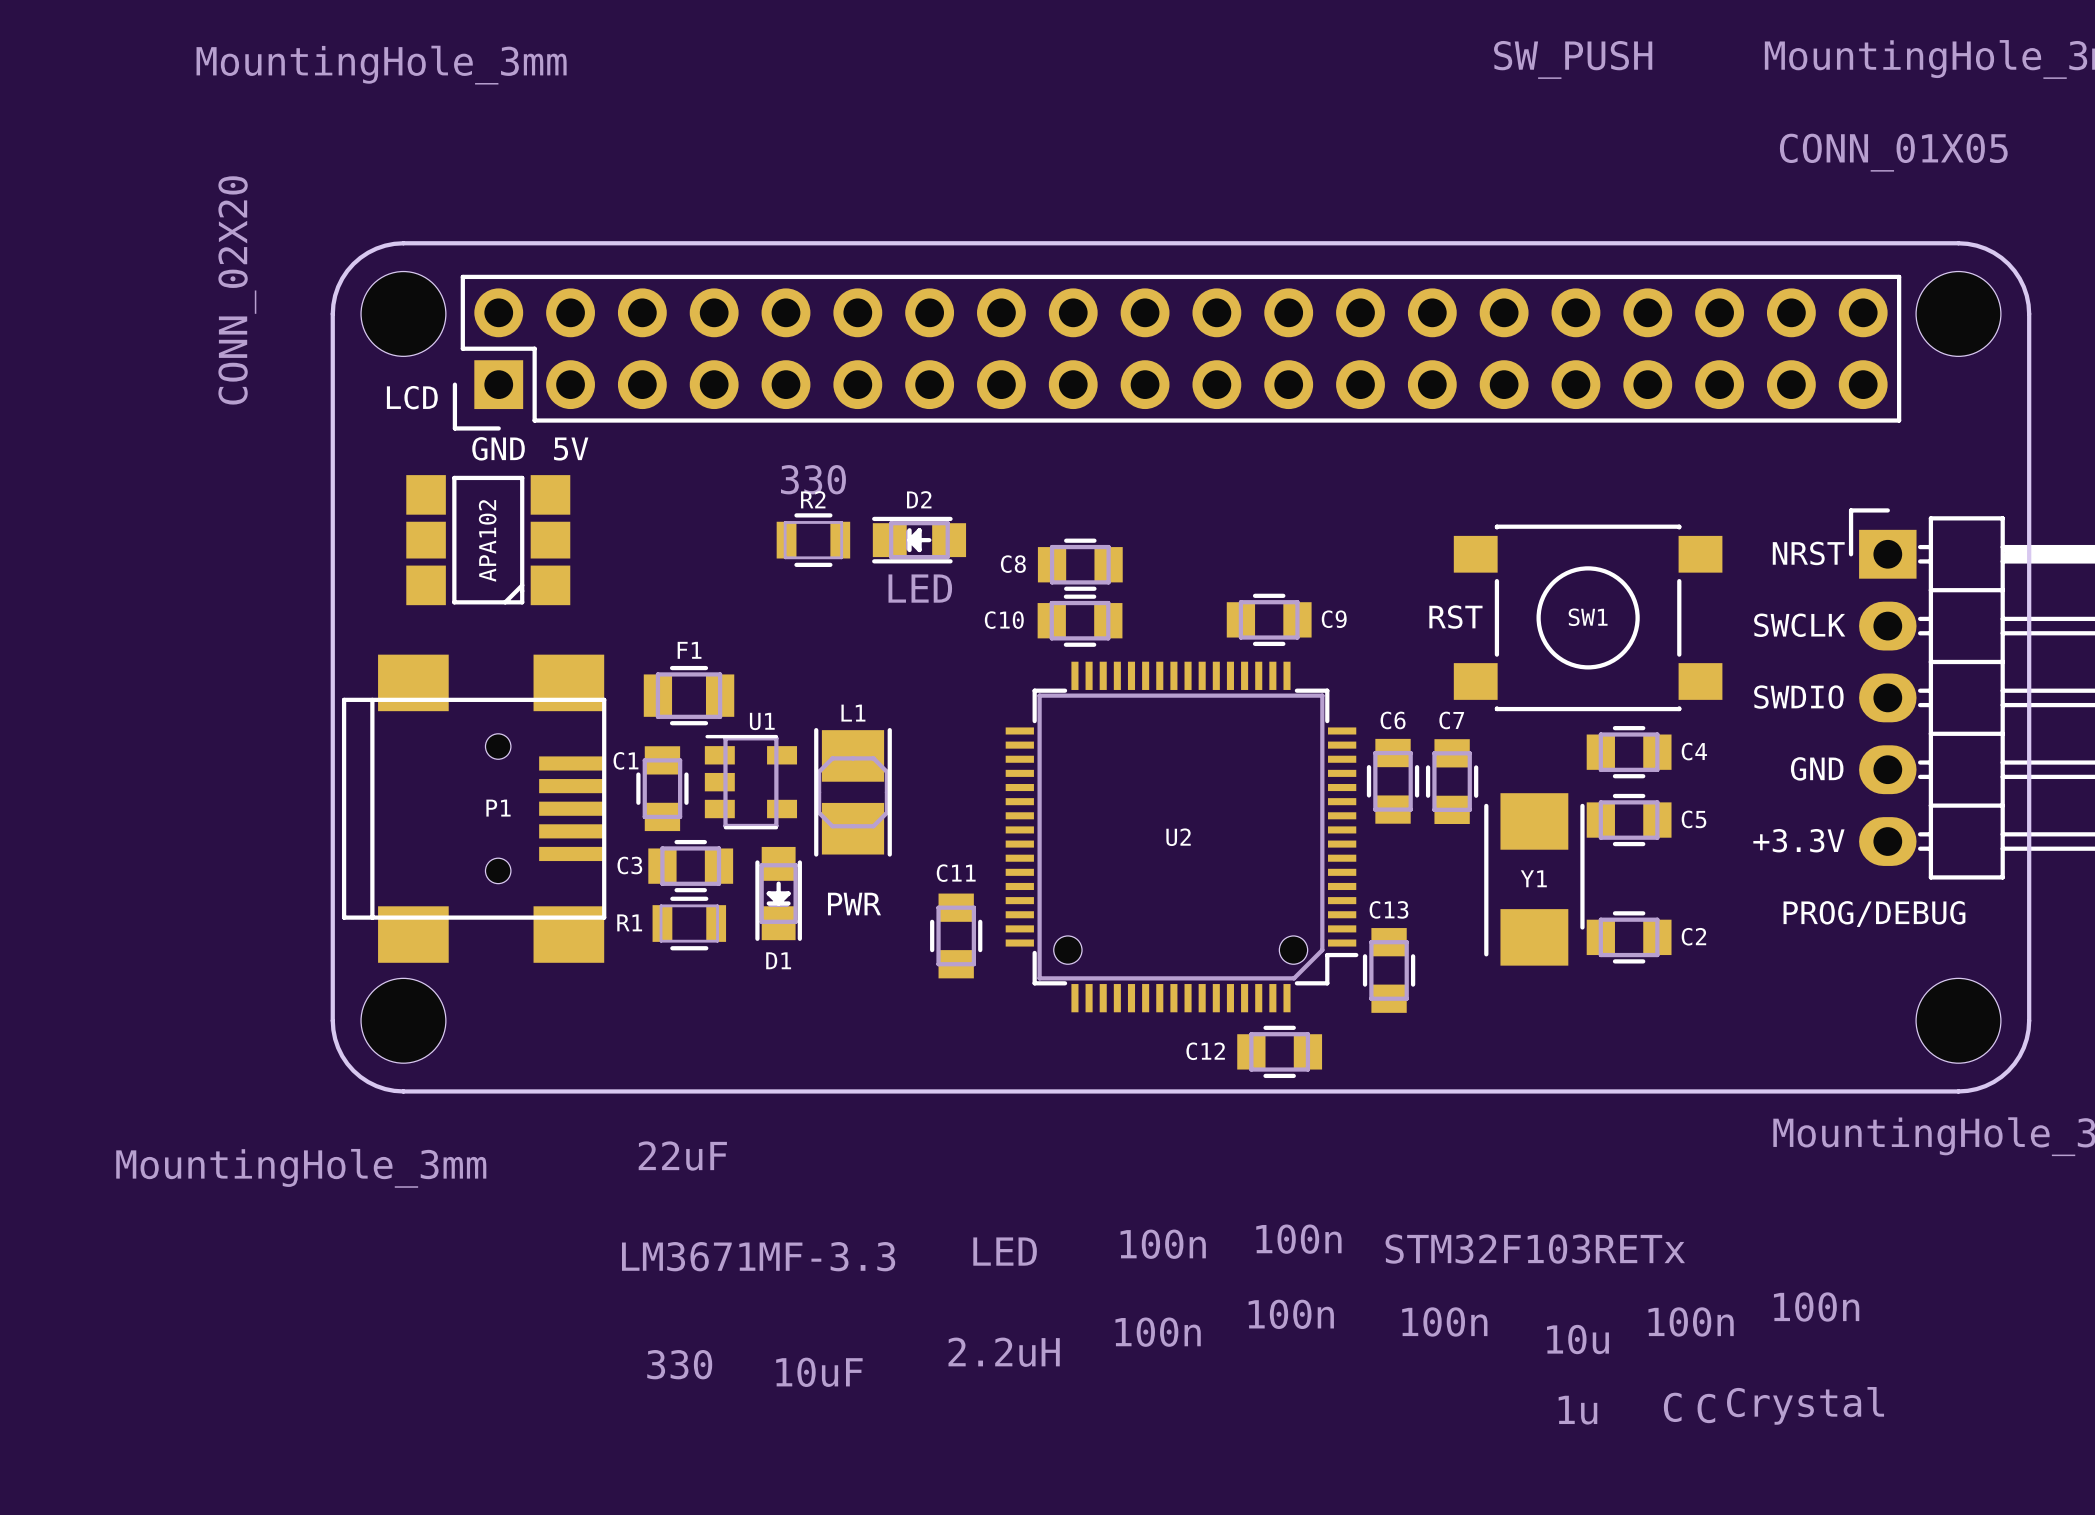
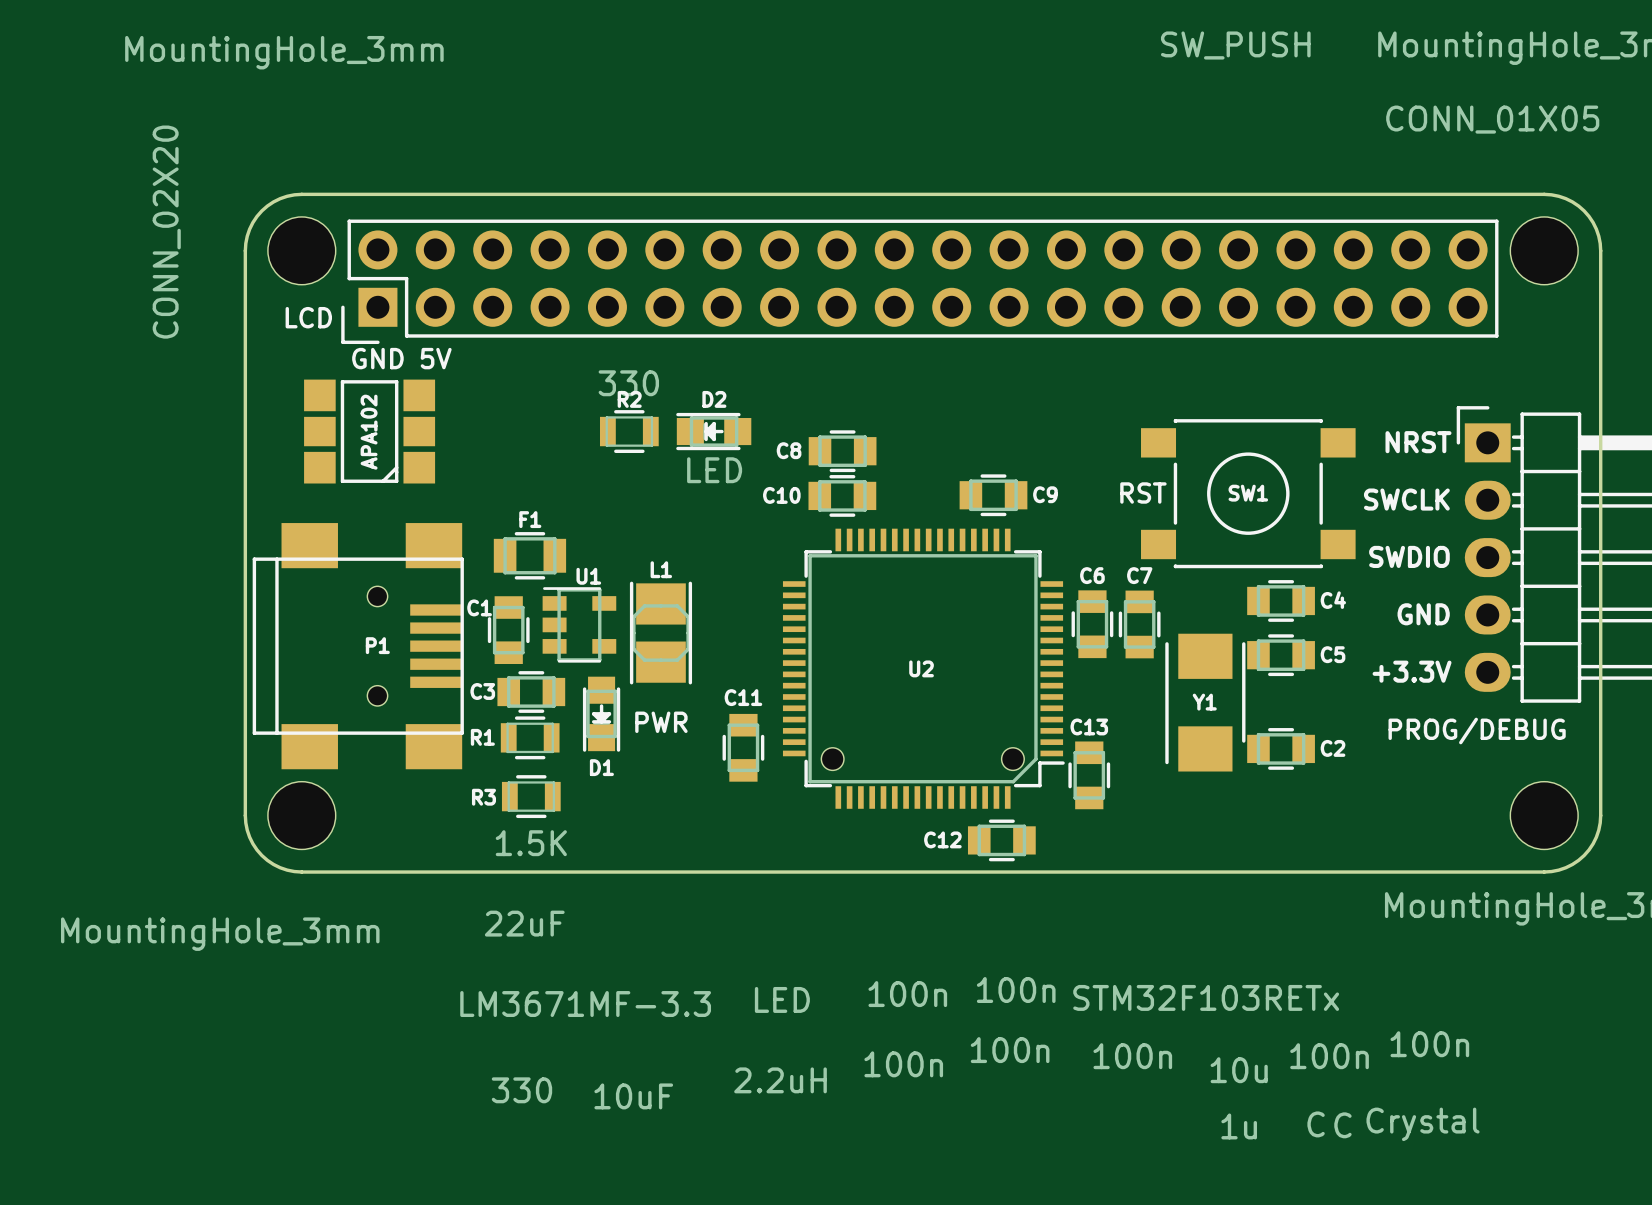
R3: none -> 1.5K (531, 796)

